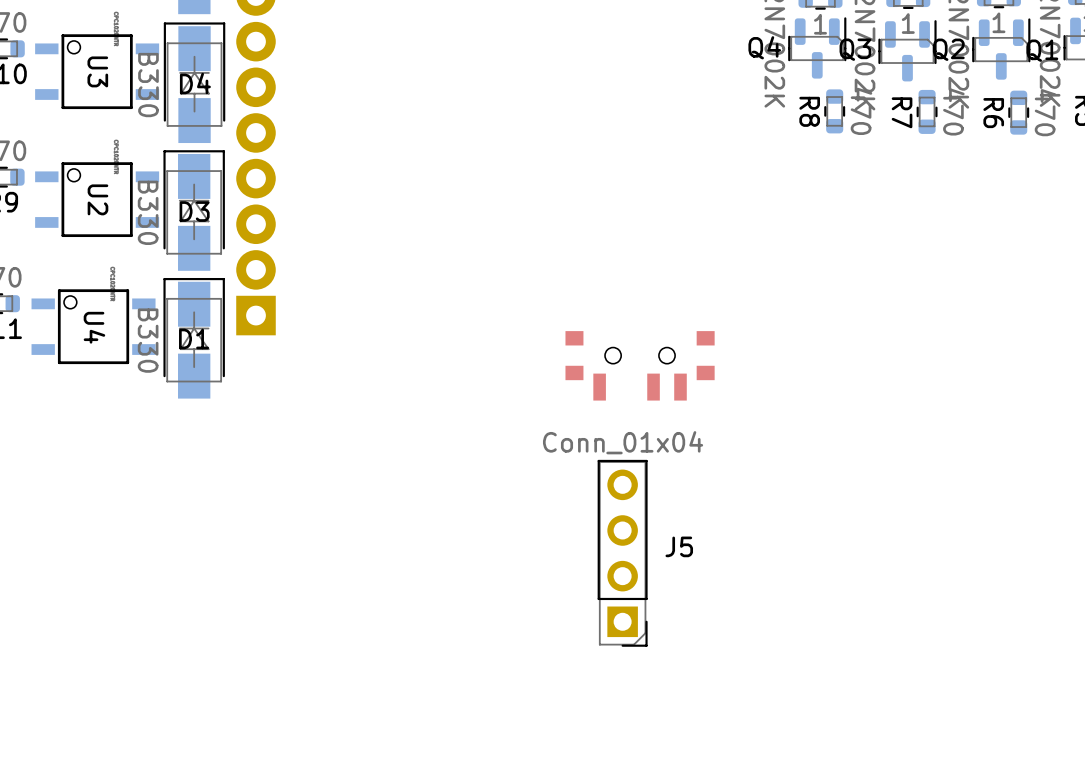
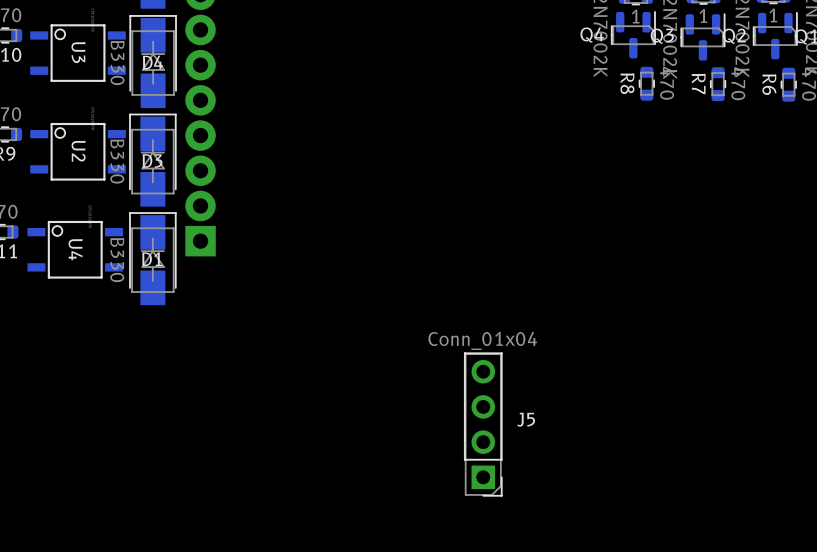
part: (640, 365) -> none

